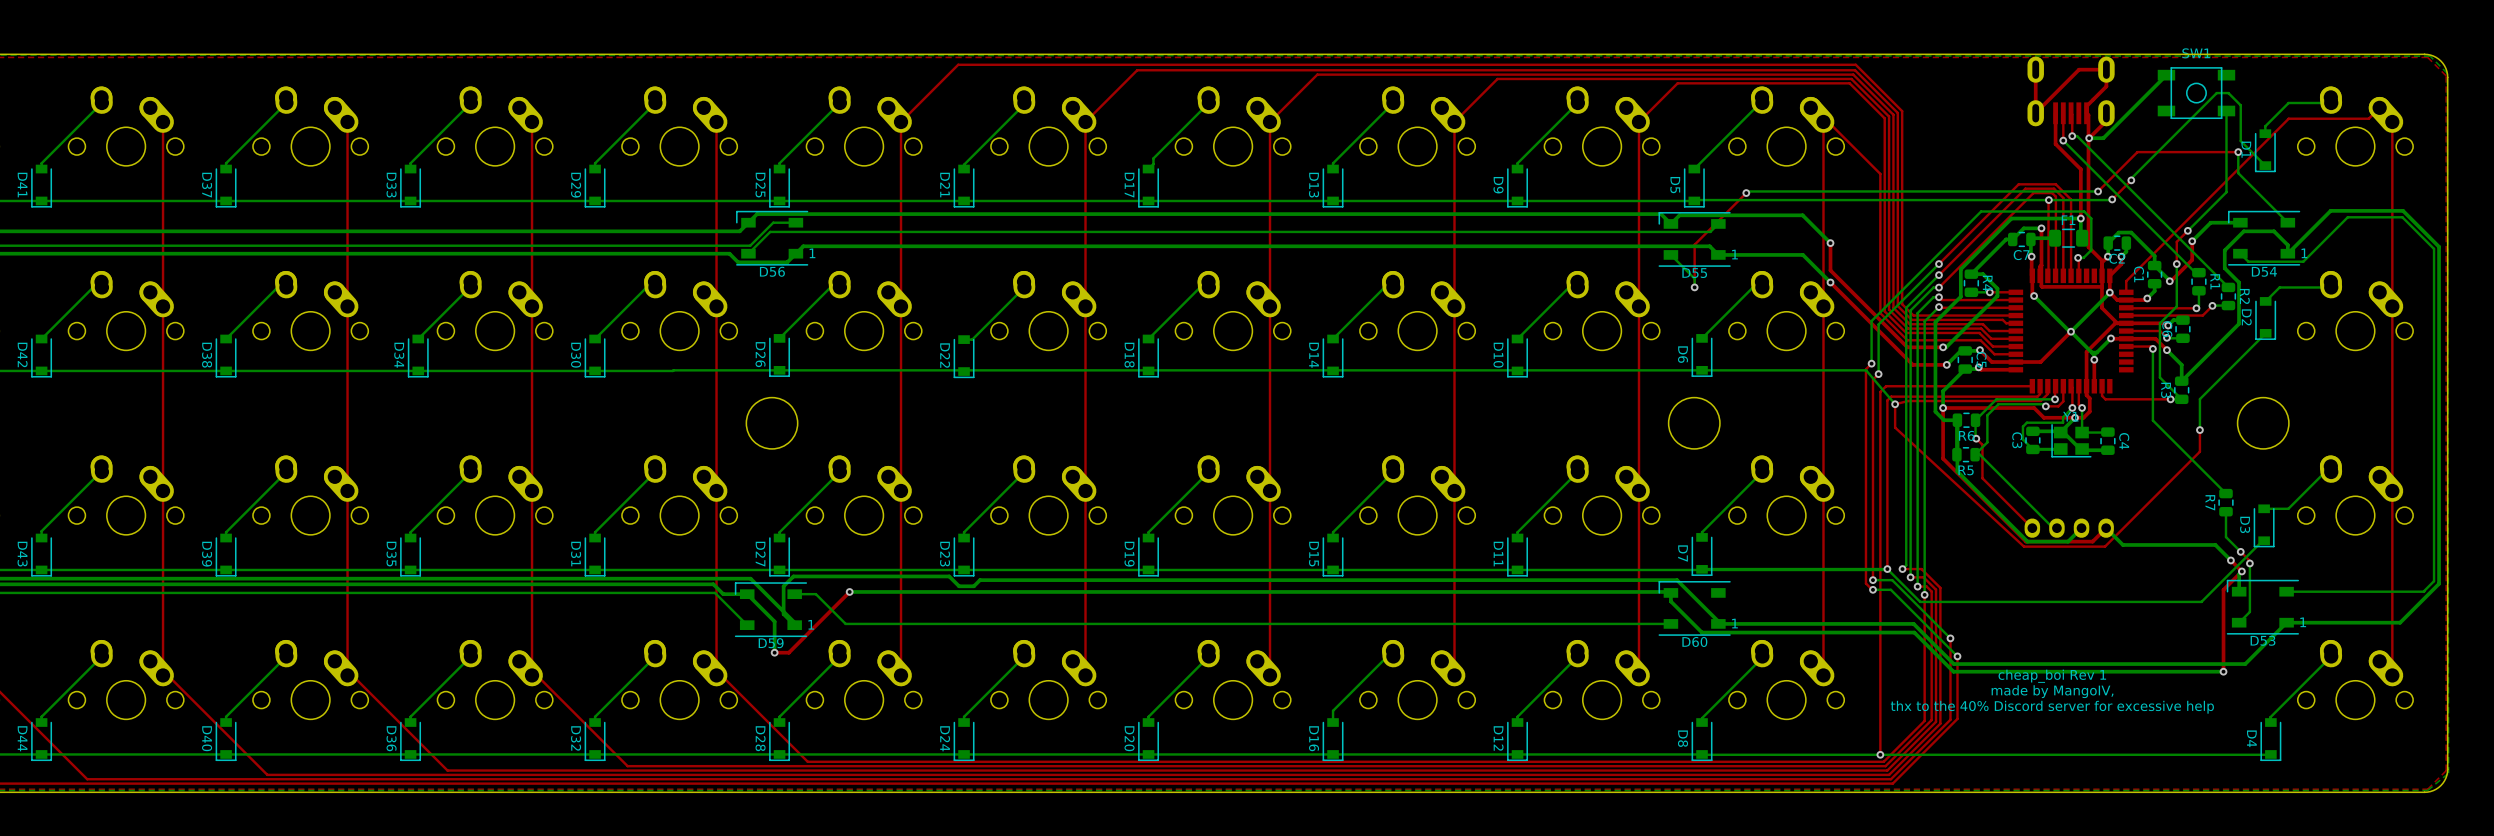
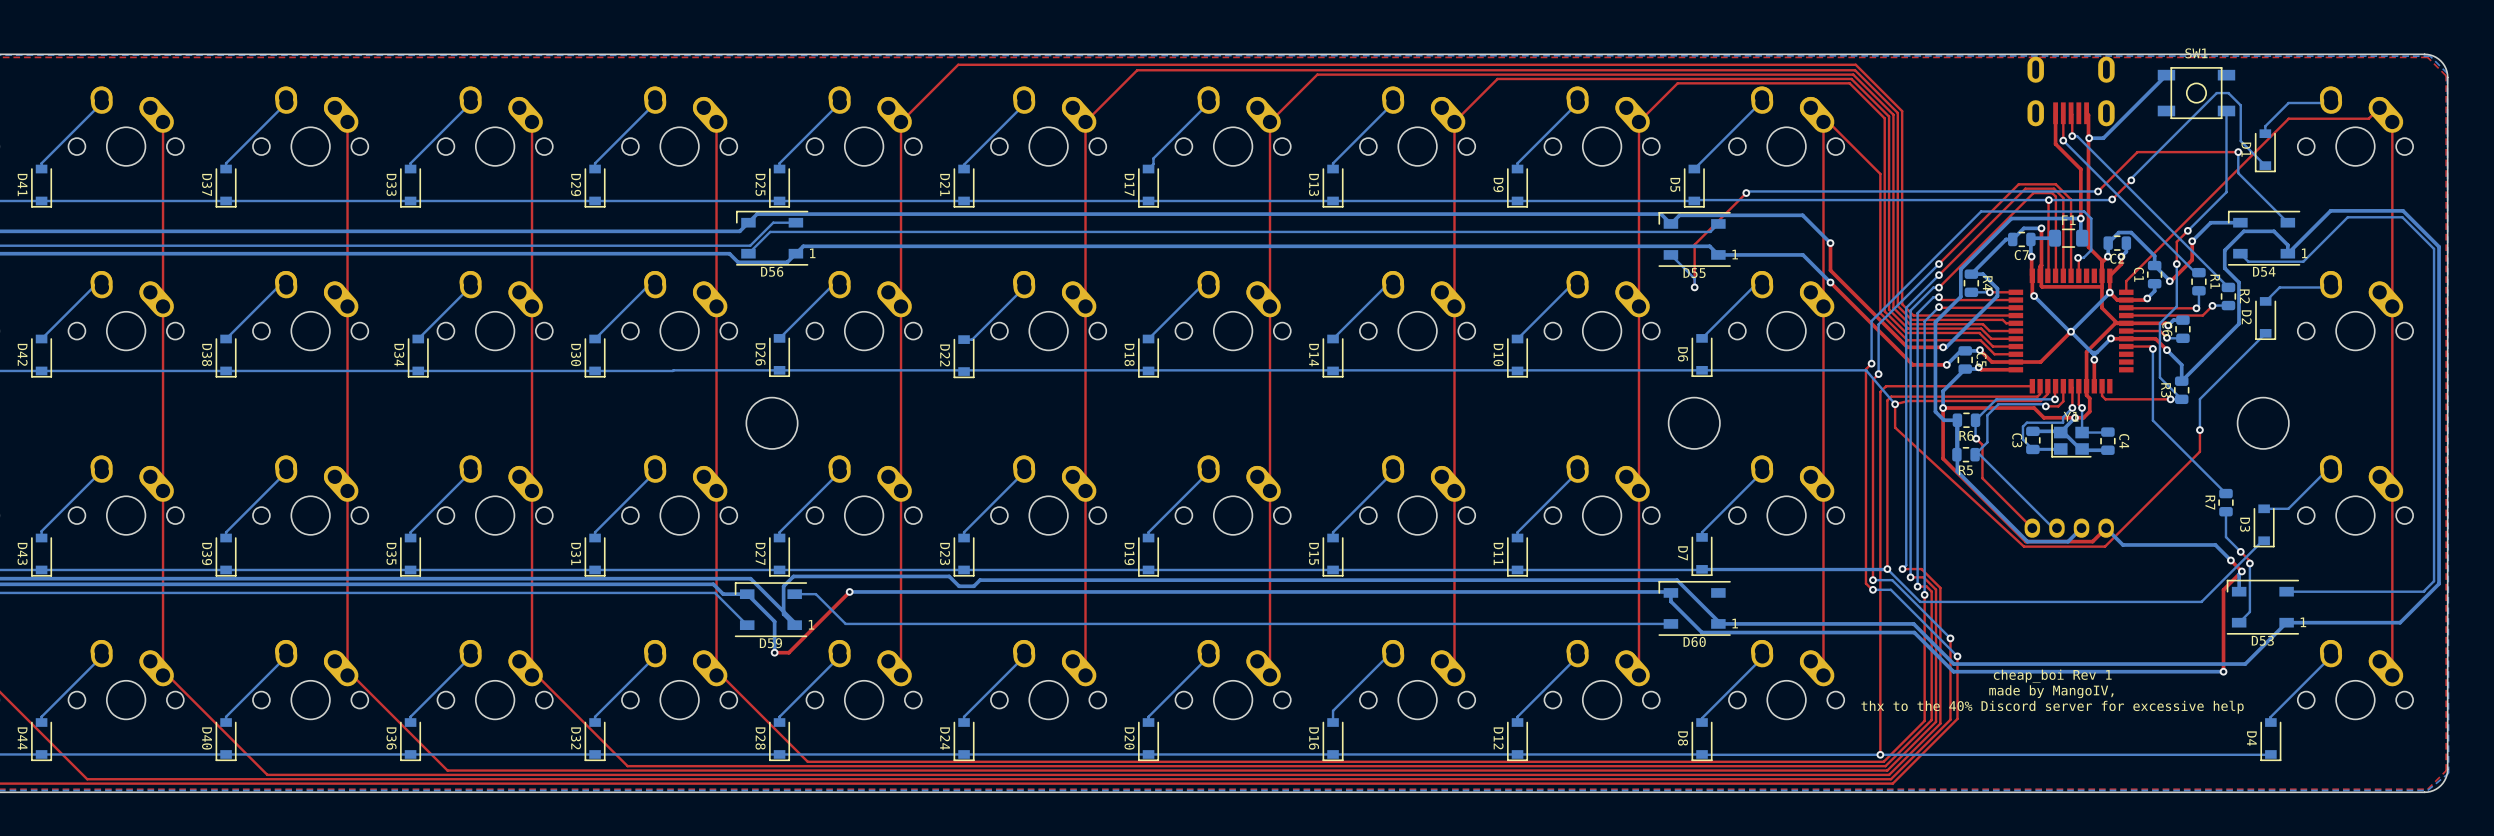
top track: (2035, 69) (2035, 113) -> none
top track: (2035, 112) (2079, 69) (2106, 69) (2106, 86) (2086, 106) (2086, 113) -> none
top track: (2106, 113) (2106, 120) (2089, 138) -> none

